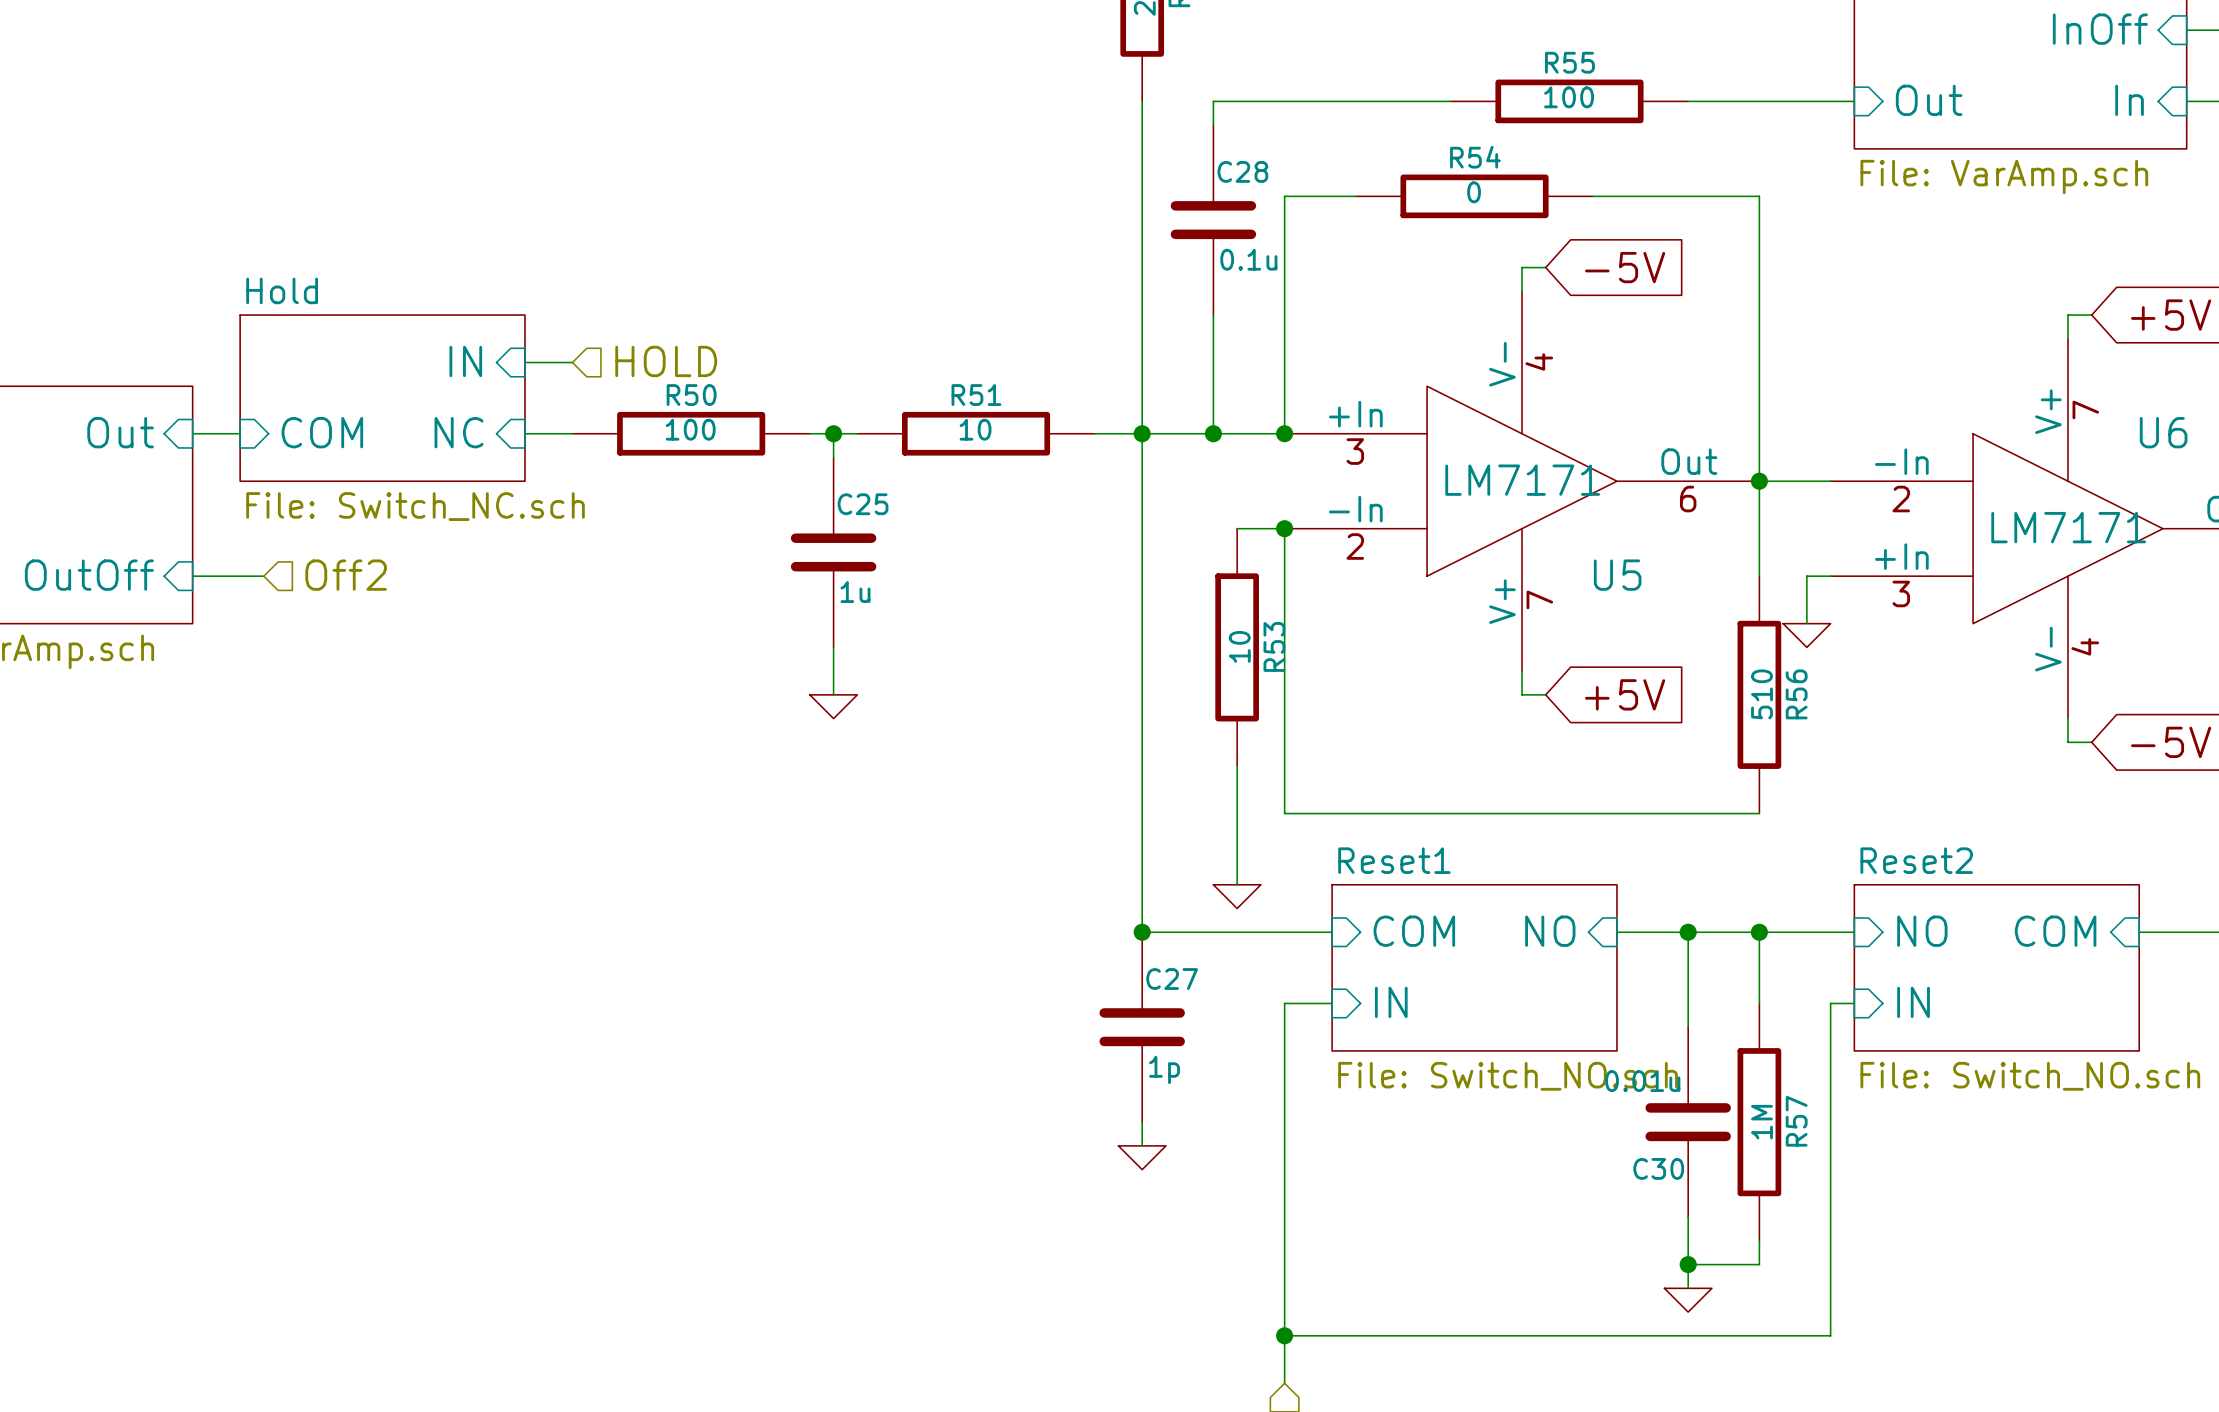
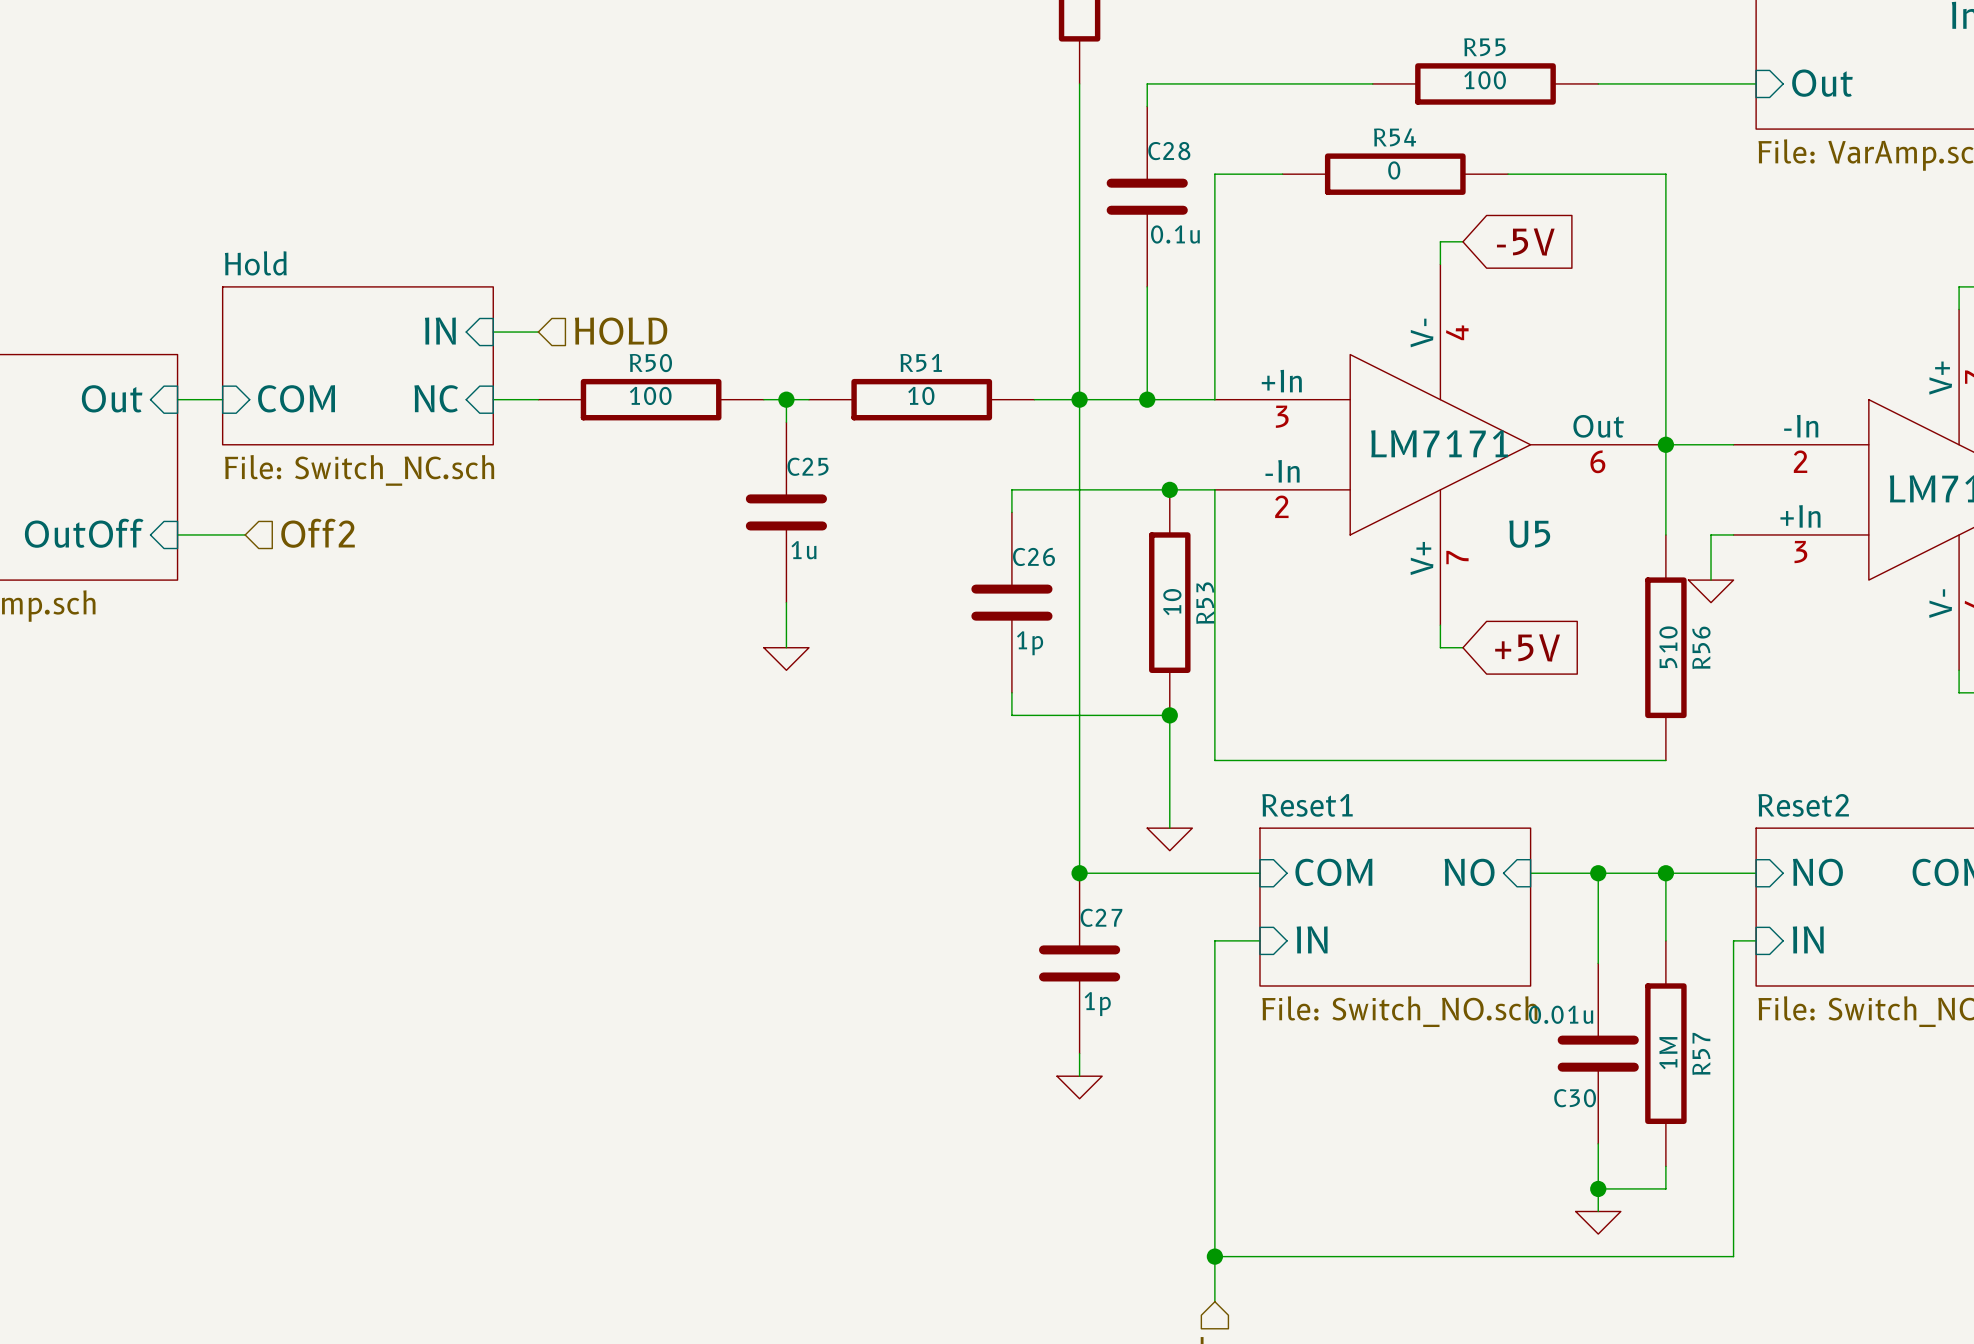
junction: (1284, 433) -> none
wire: none -> (1169, 489) (1011, 489) (1011, 512)
junction position: (1284, 528) -> (1169, 489)
C26: none -> 1p (1011, 602)
wire: none -> (1011, 692) (1011, 715) (1169, 715)
junction: none -> (1169, 715)

